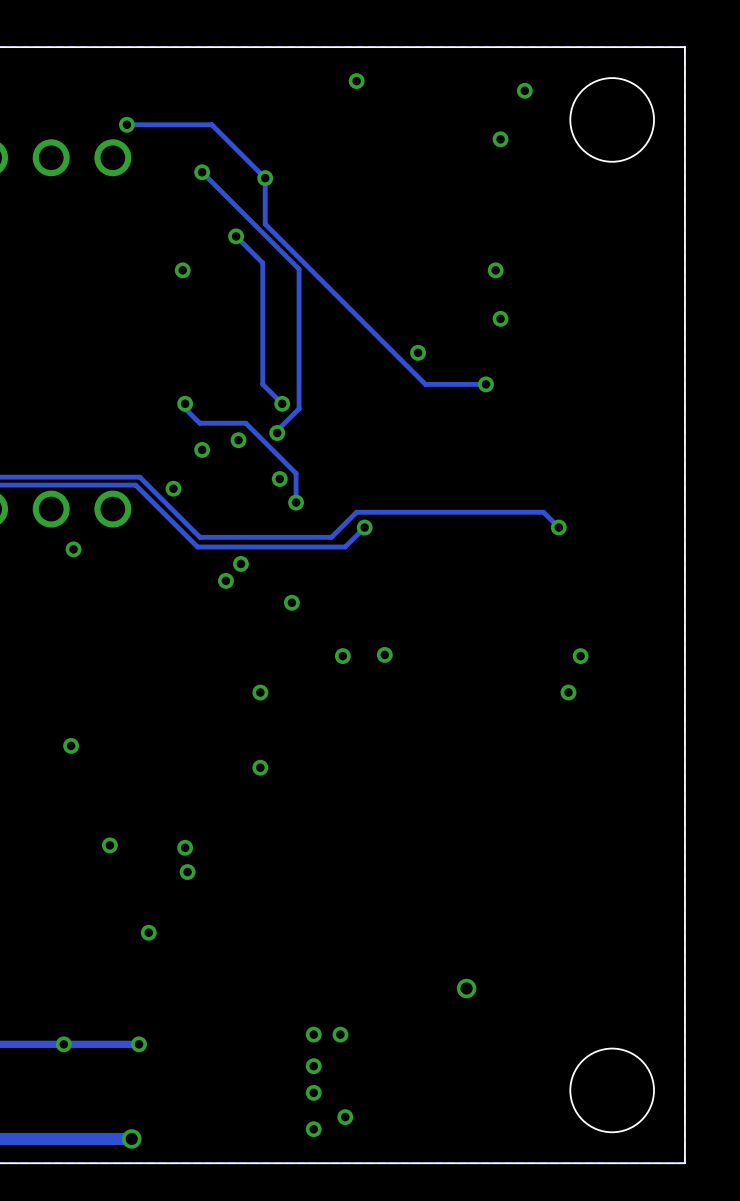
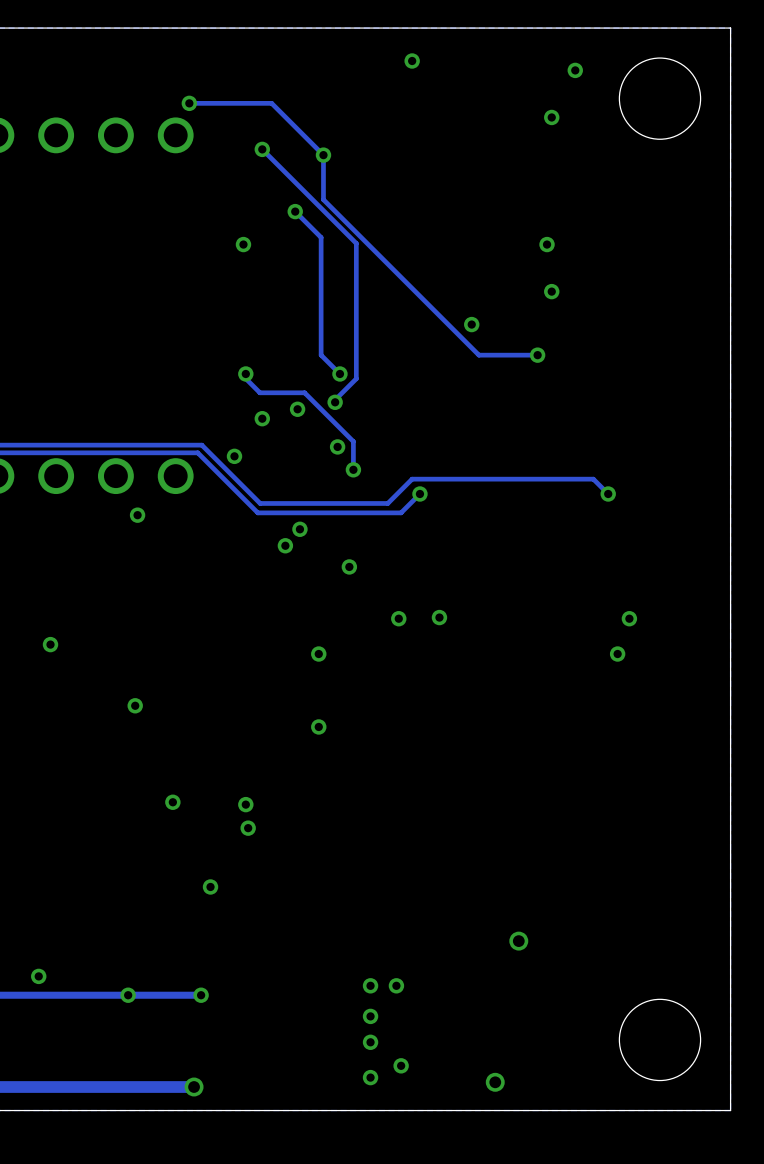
via: none -> (495, 1082)

